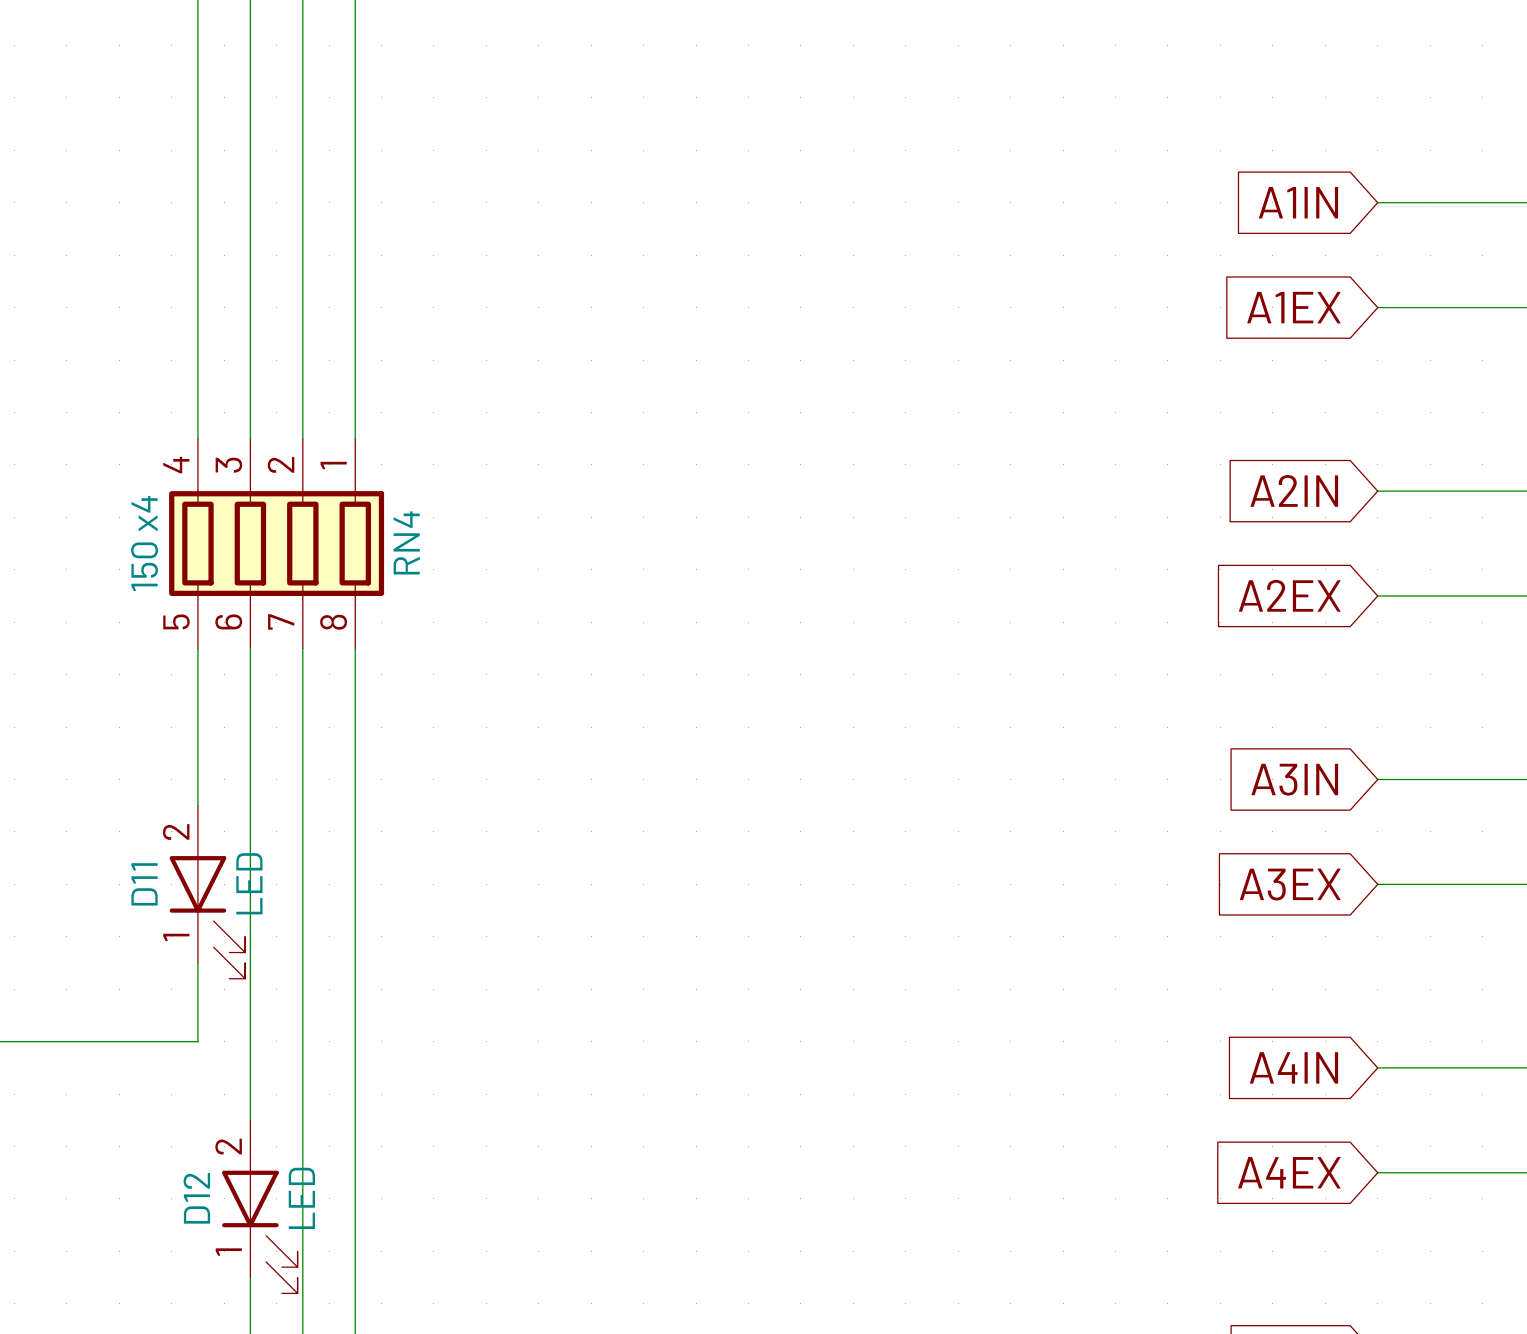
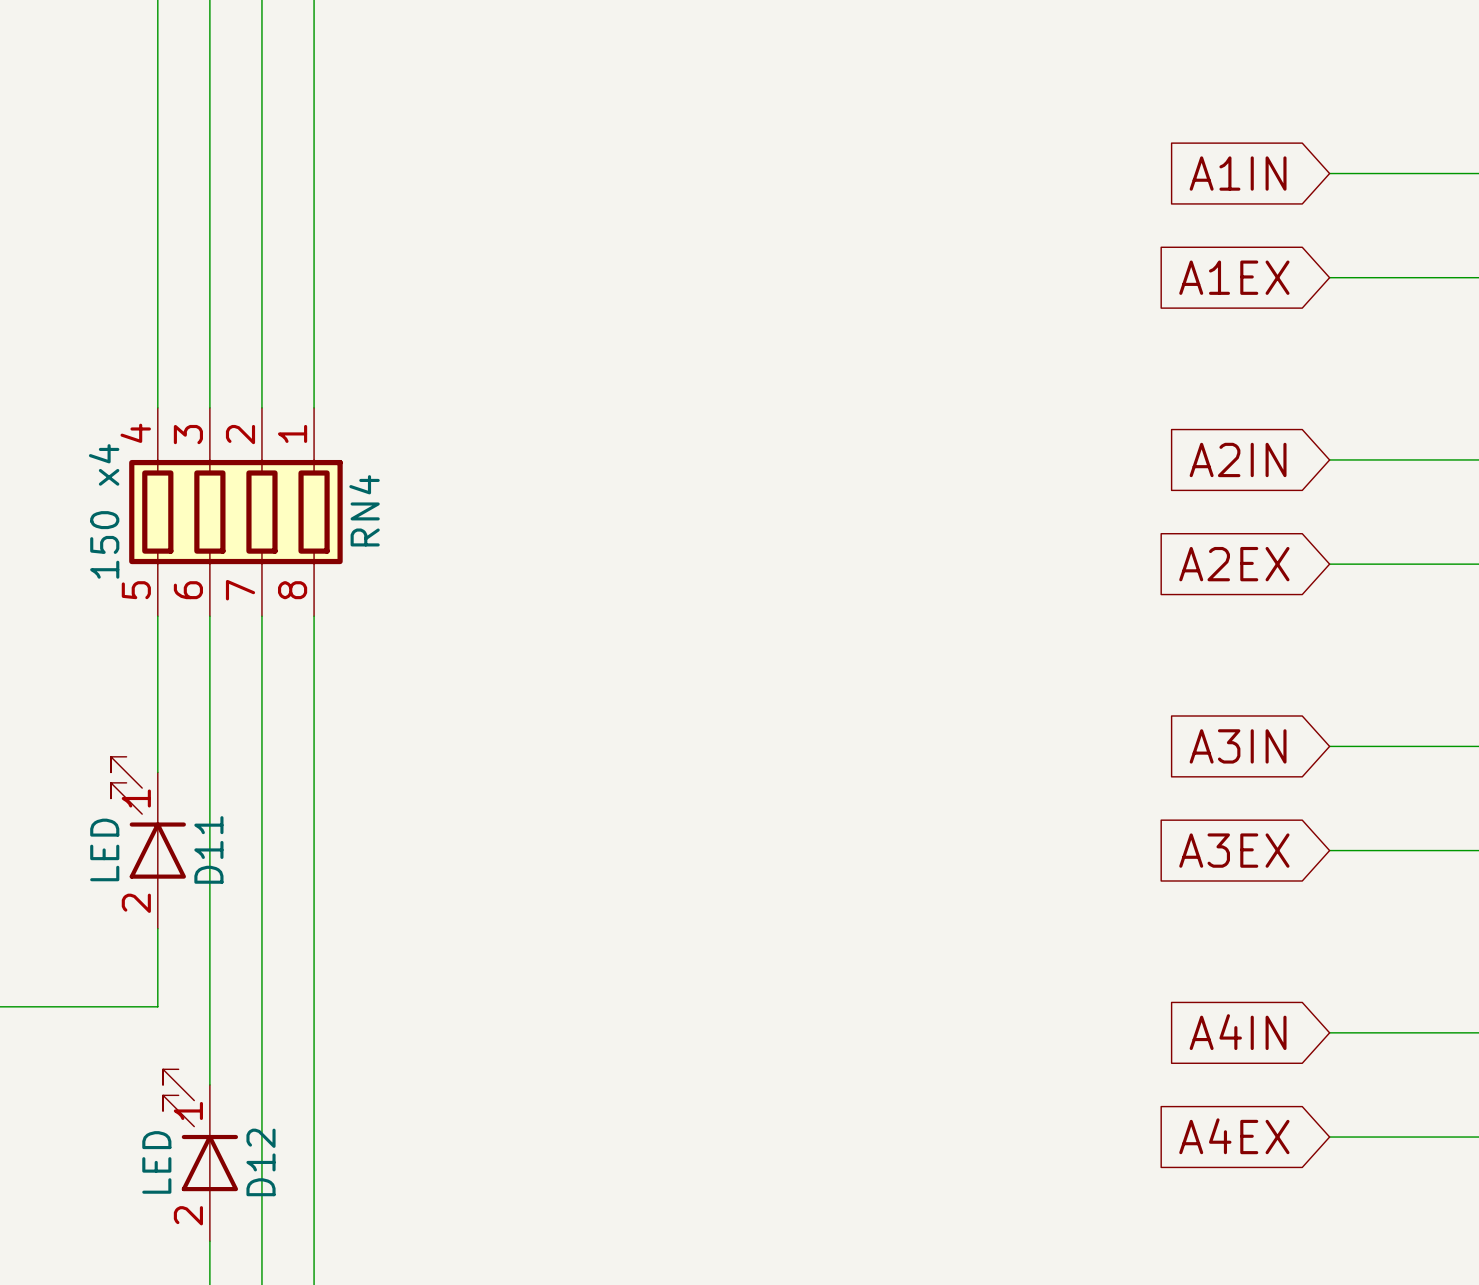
D11 rotation: 0° (207, 917) -> 180° (148, 817)
D12 rotation: 0° (259, 1232) -> 180° (200, 1130)

